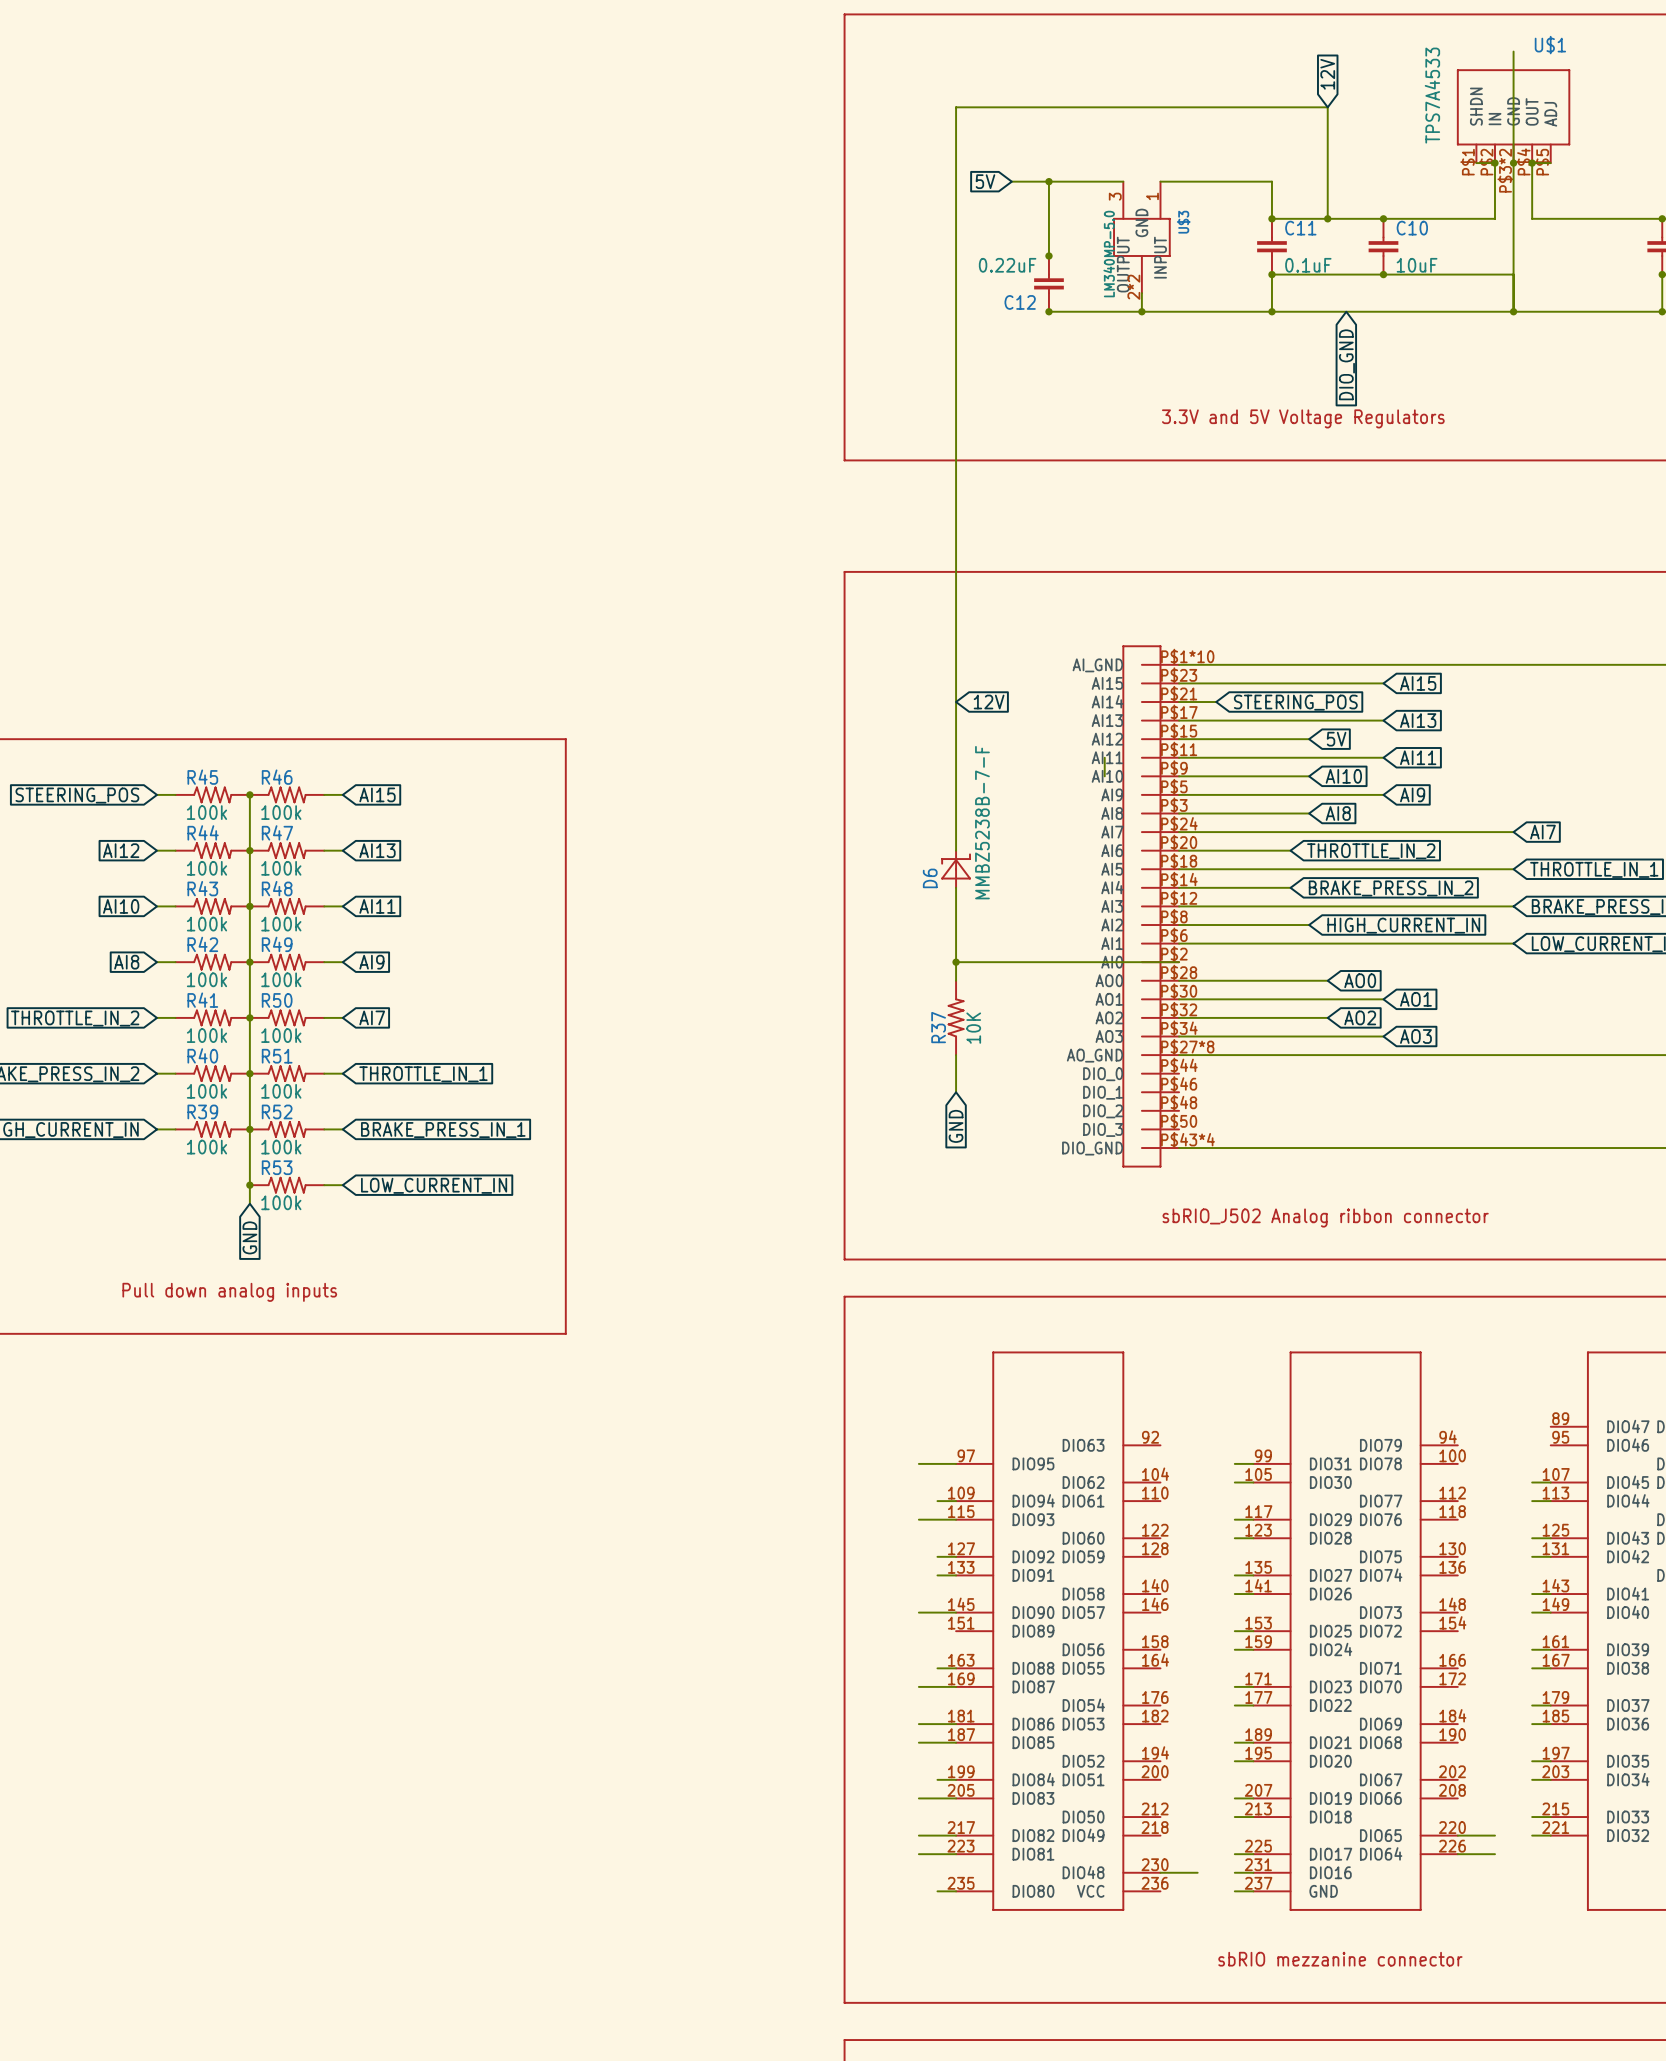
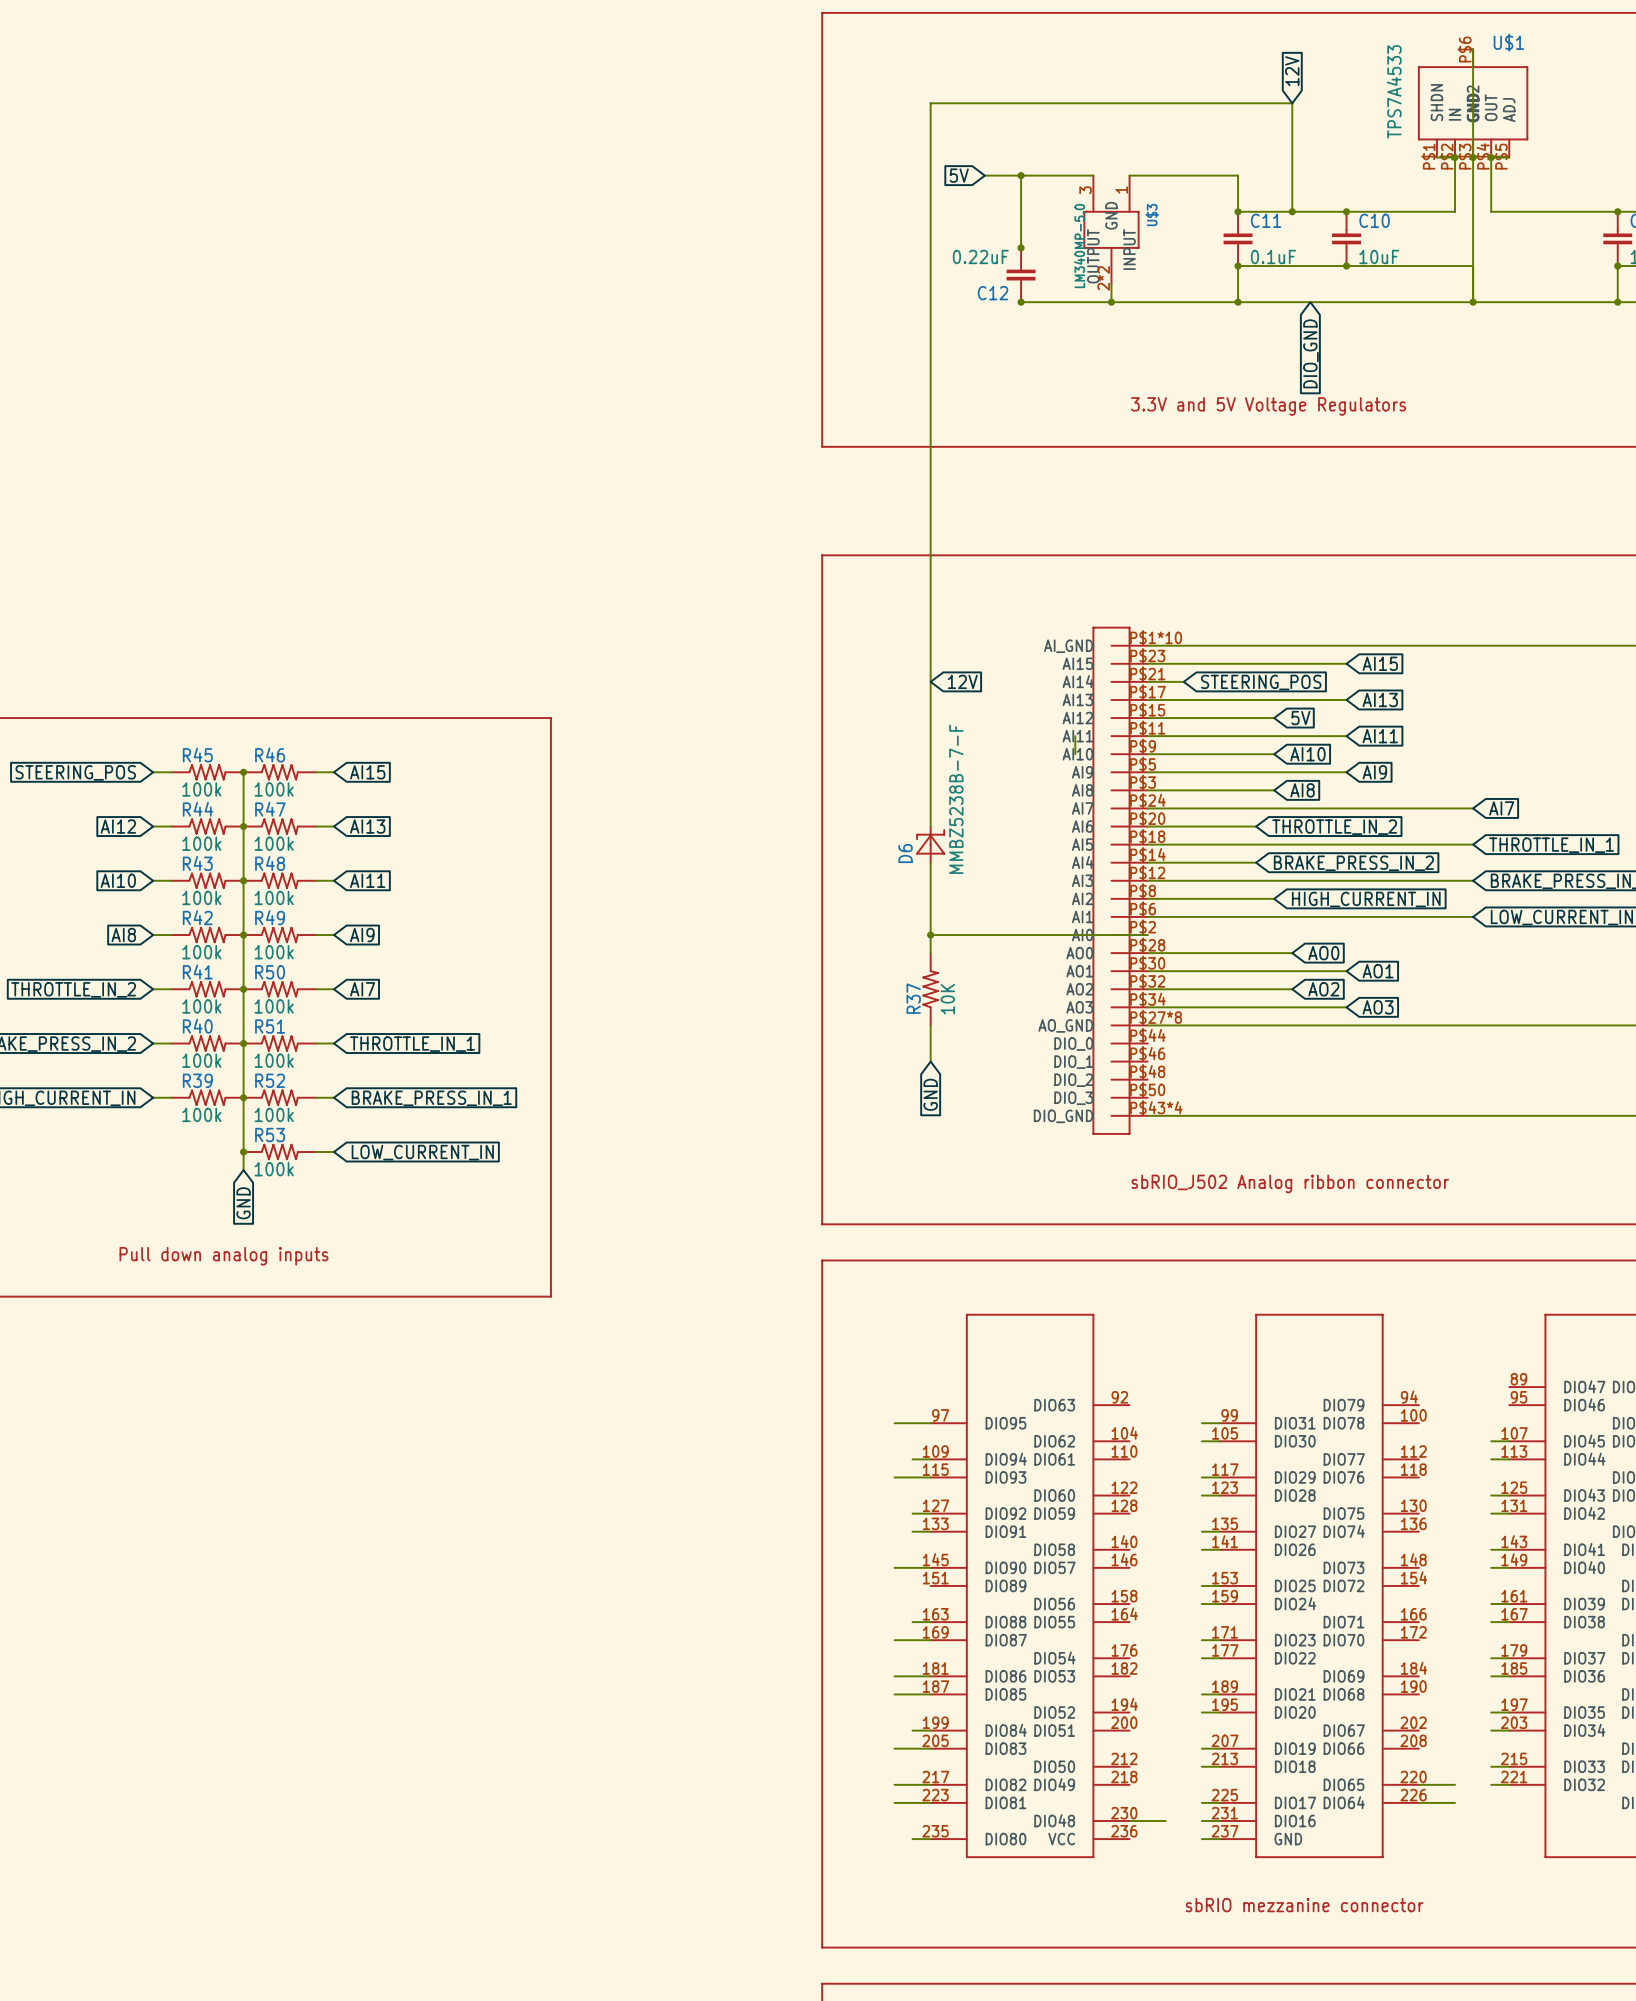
U$1 symbol: [1456, 69, 1571, 164] -> [1417, 49, 1529, 158]

